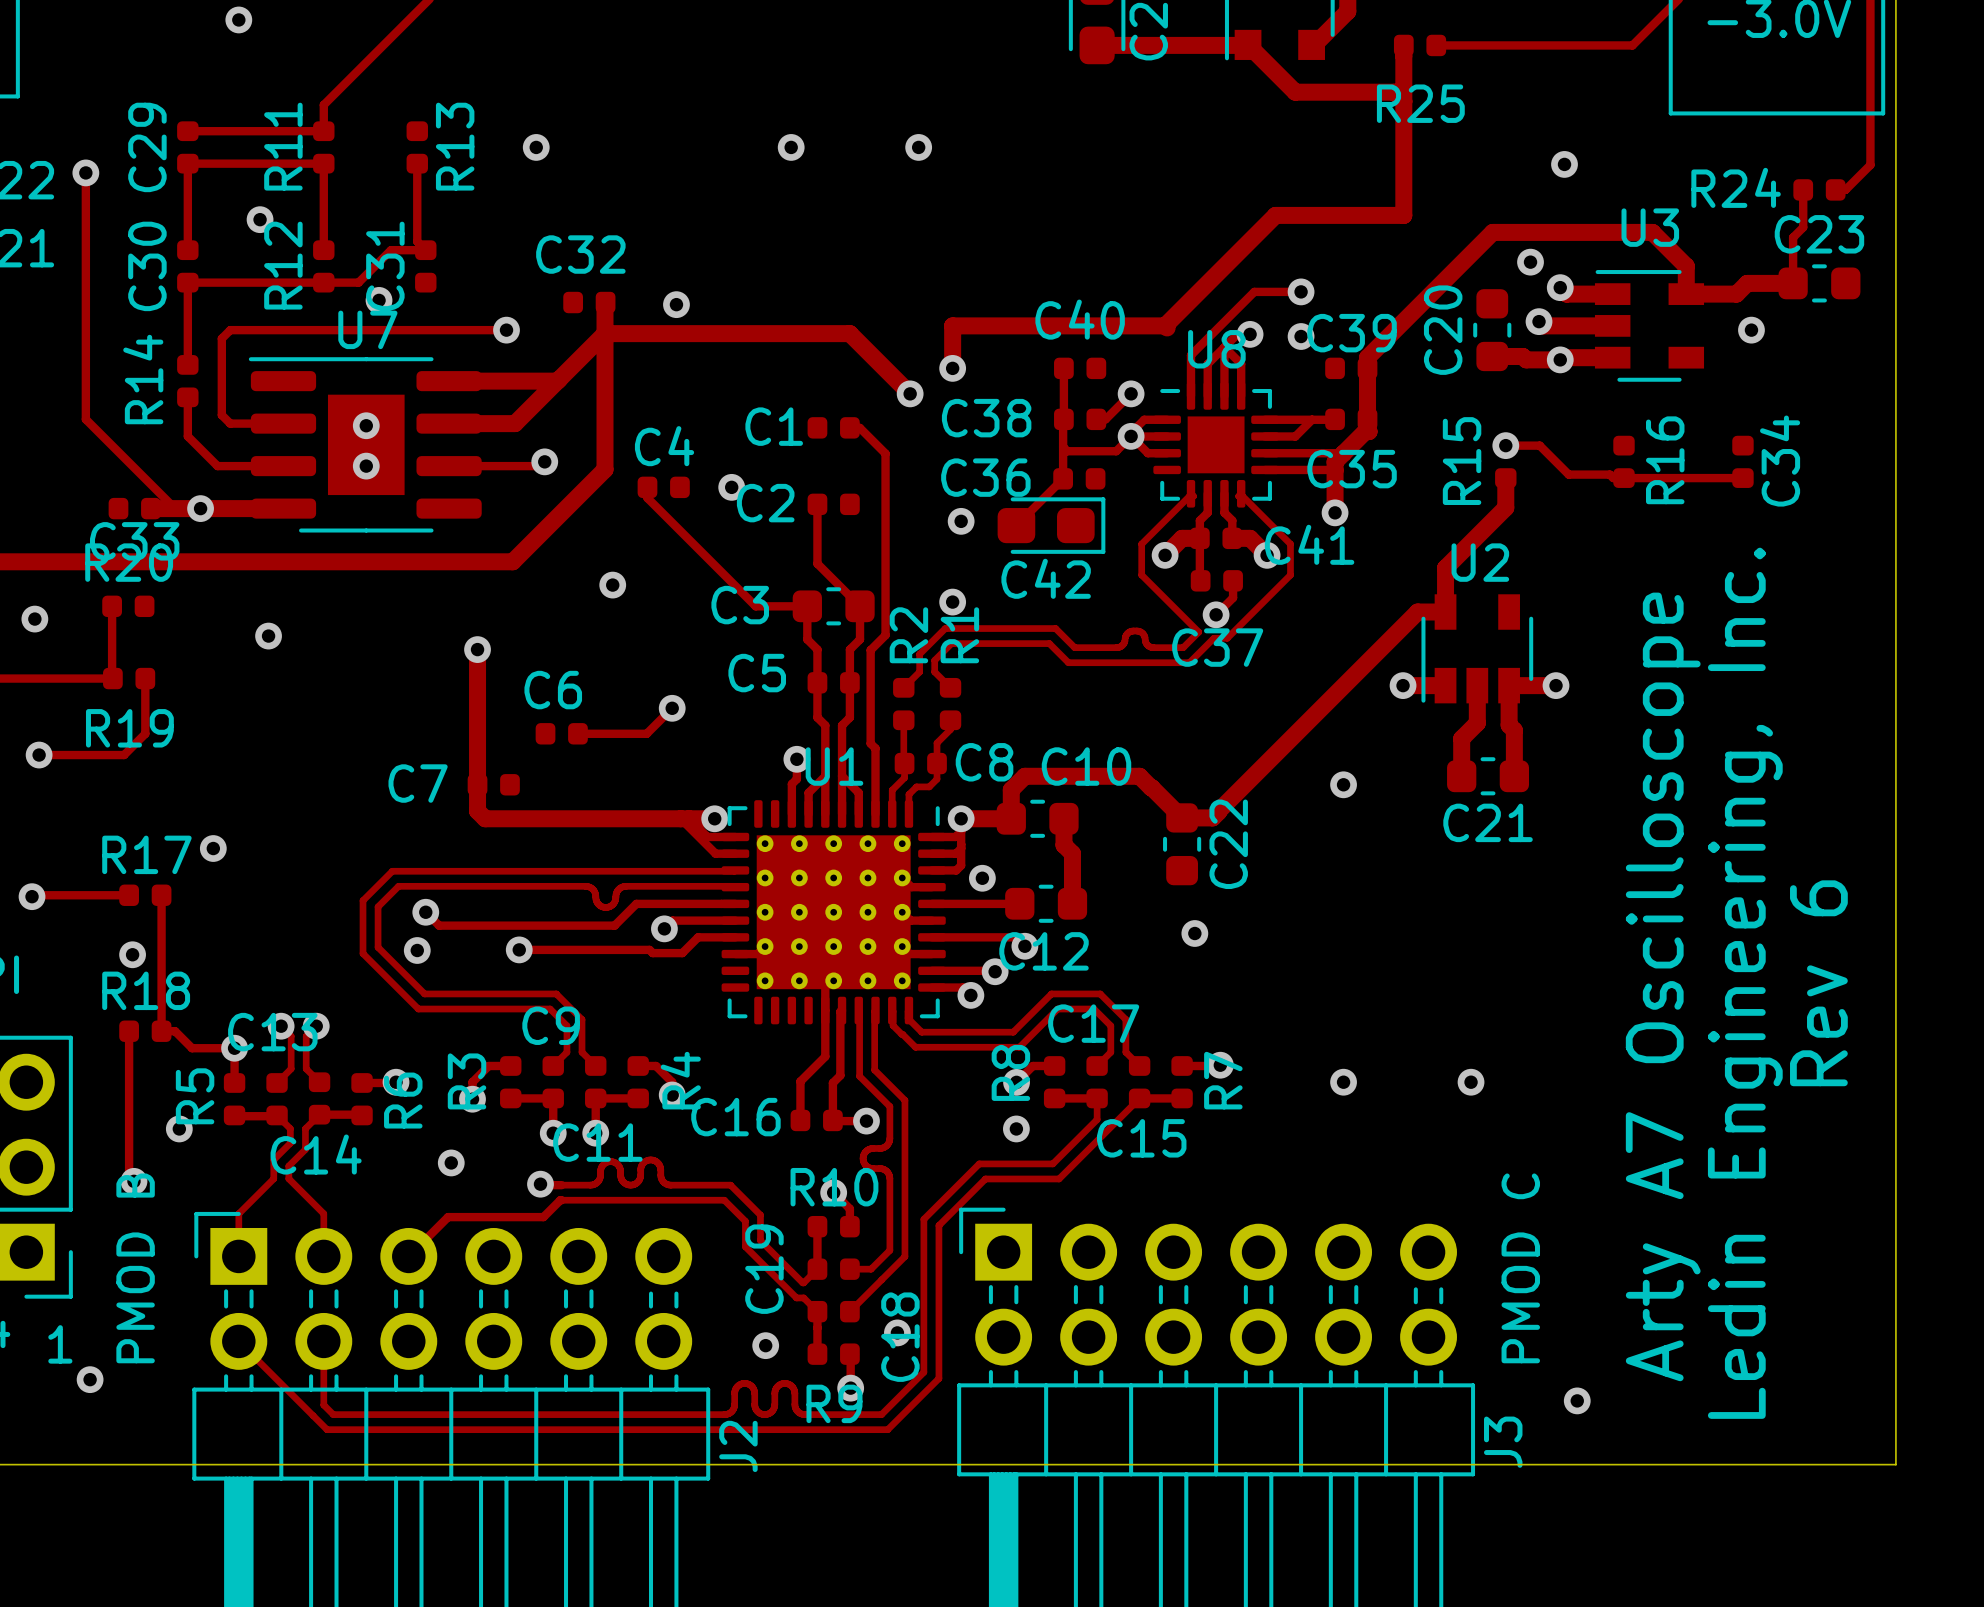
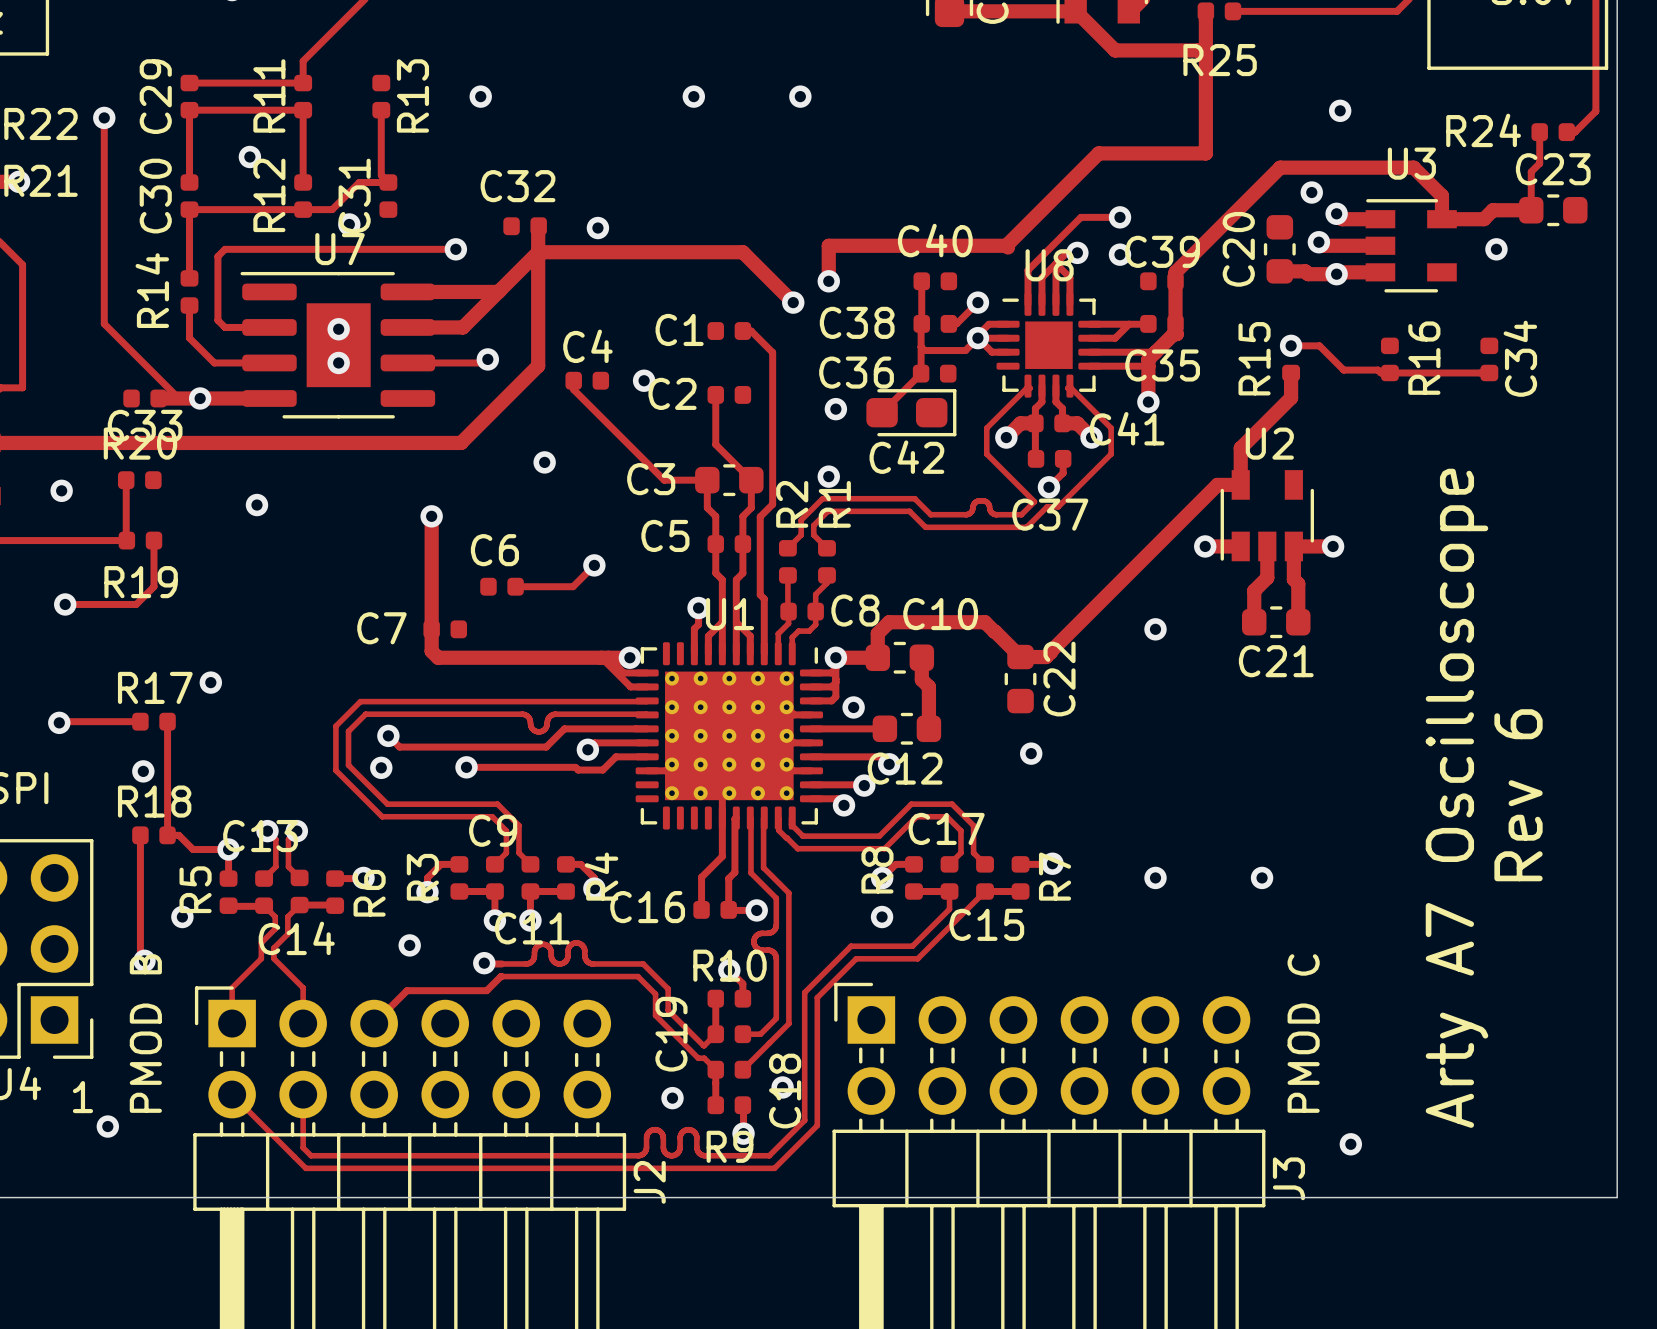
text: Ledin Engineering, Inc. (1745, 983) -> none
text position: Rev 6 (1818, 983) -> Rev 6 (1518, 795)
text position: Arty A7 Oscilloscope (1663, 986) -> Arty A7 Oscilloscope (1456, 798)

